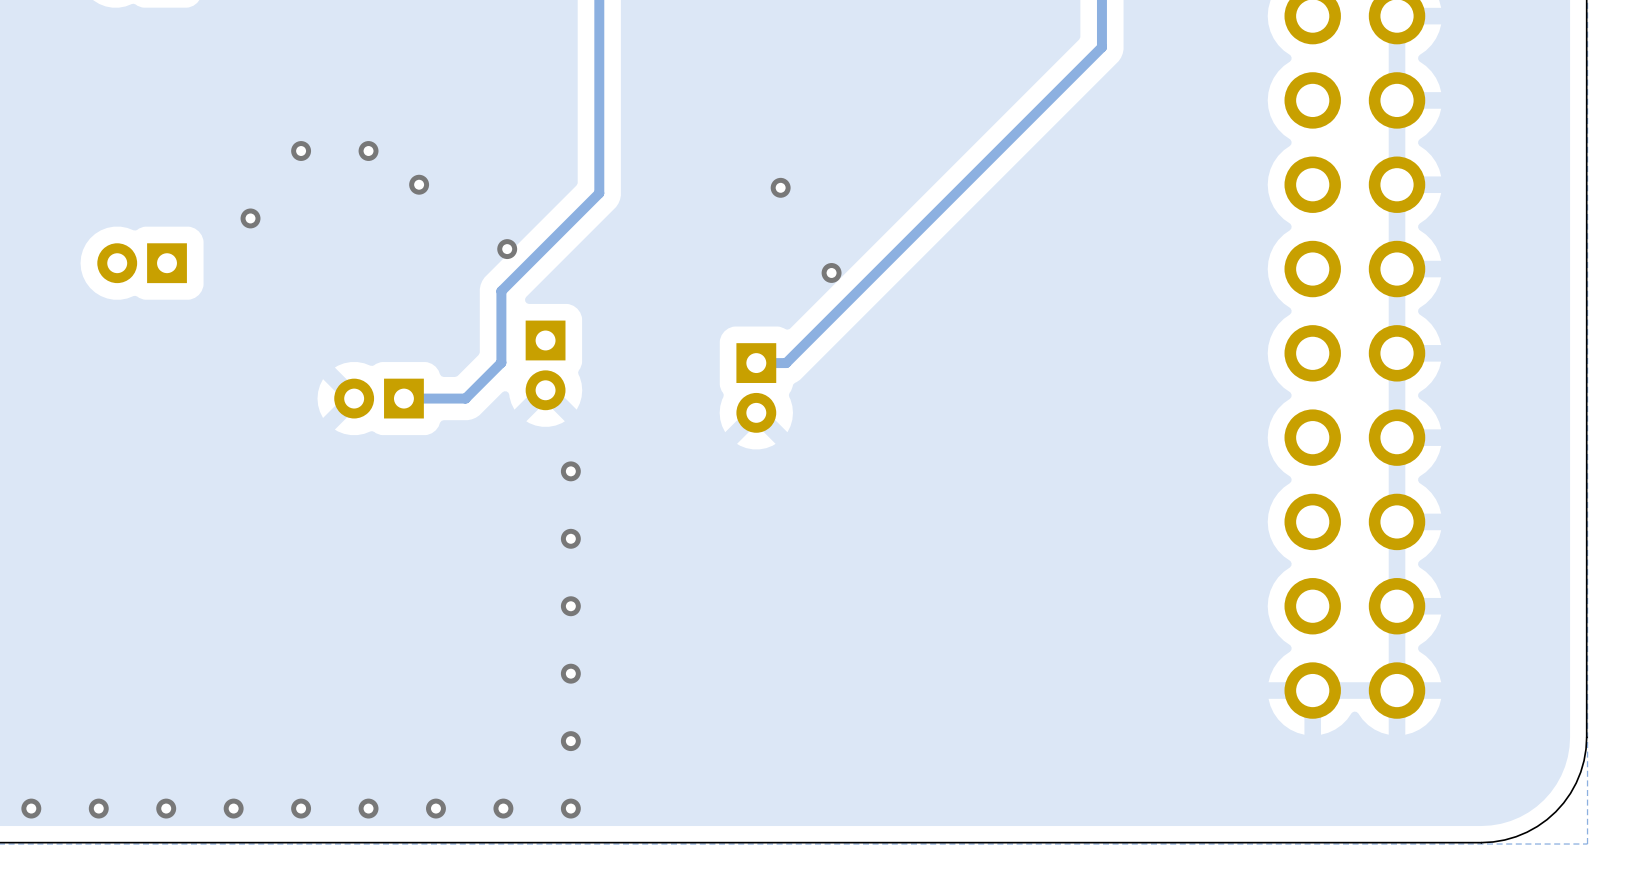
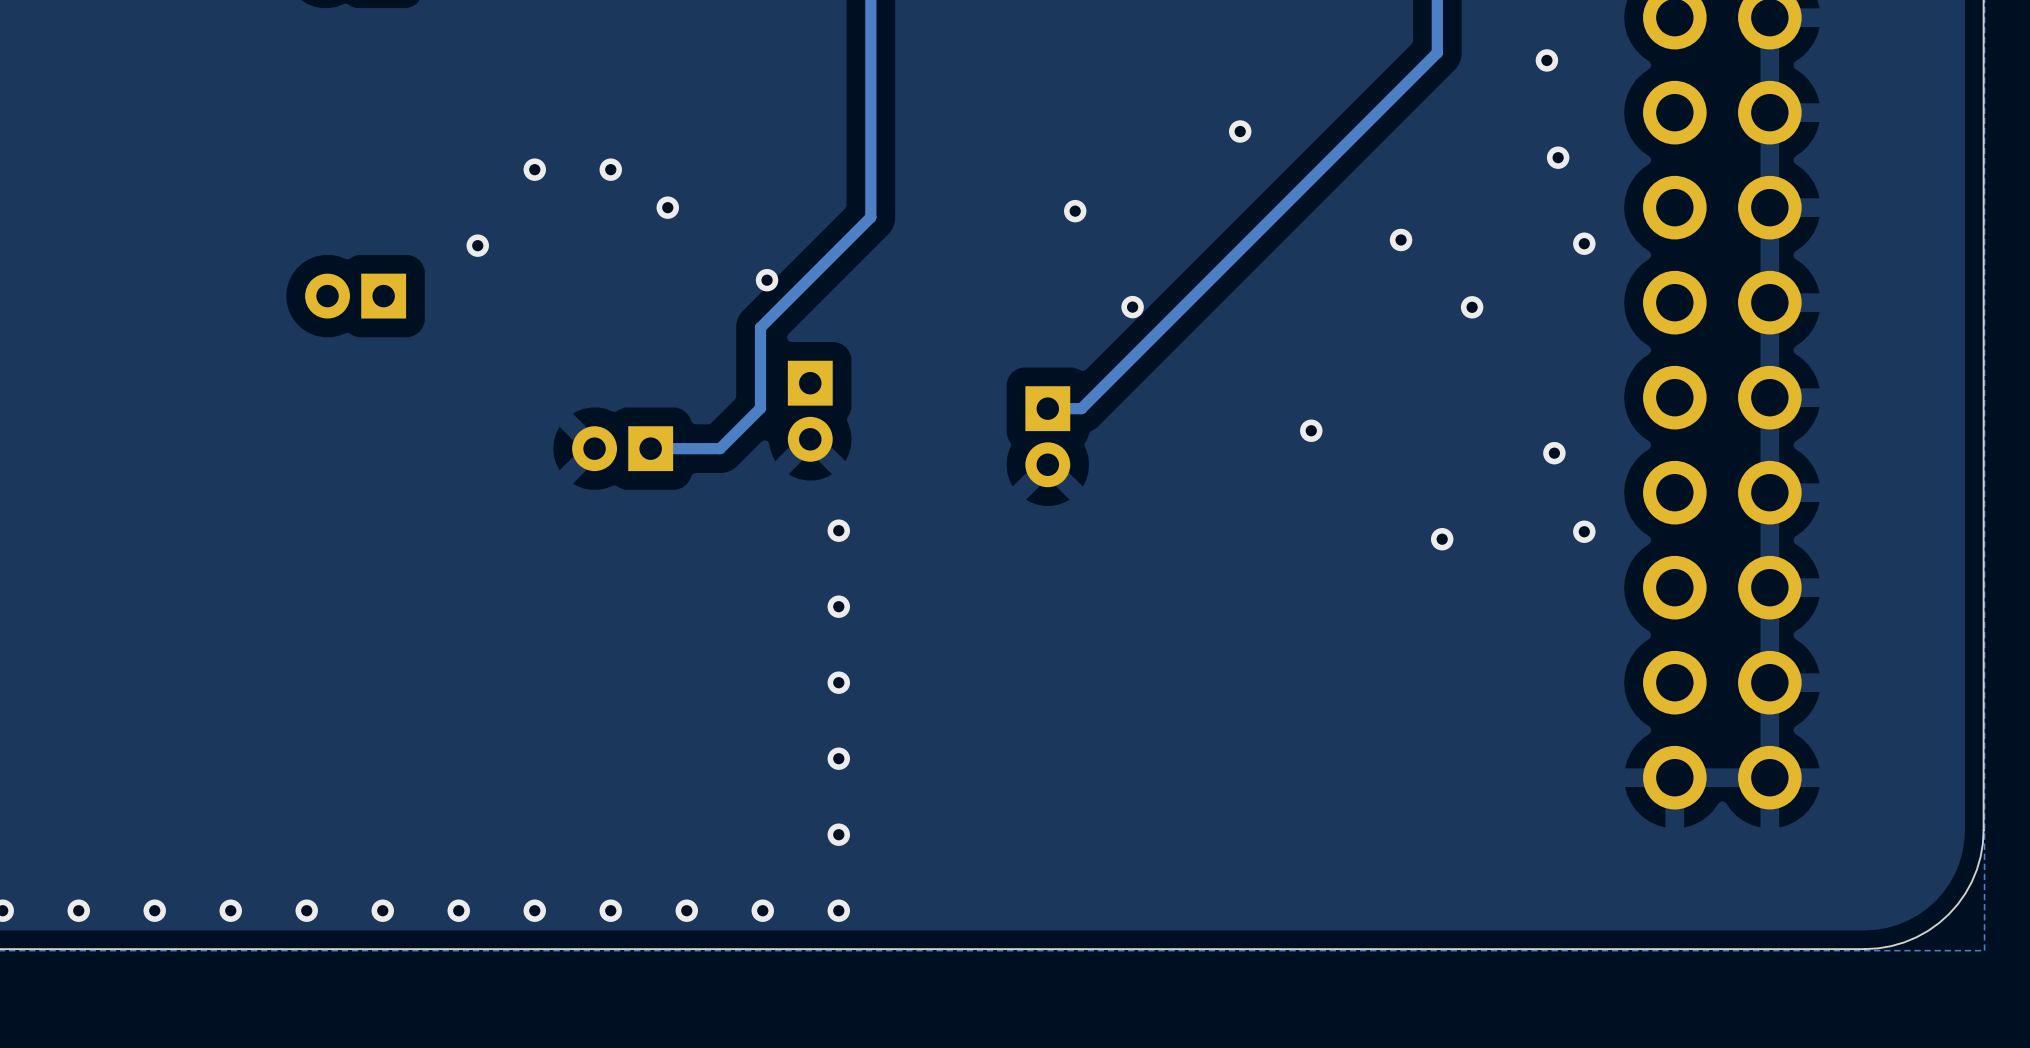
via: none -> (1546, 60)
via: none -> (1240, 131)
via: none -> (1558, 157)
via: none -> (1401, 239)
via: none -> (1584, 243)
via: none -> (1472, 307)
via: none -> (1311, 430)
via: none -> (1554, 453)
via: none -> (1584, 531)
via: none -> (1442, 539)

